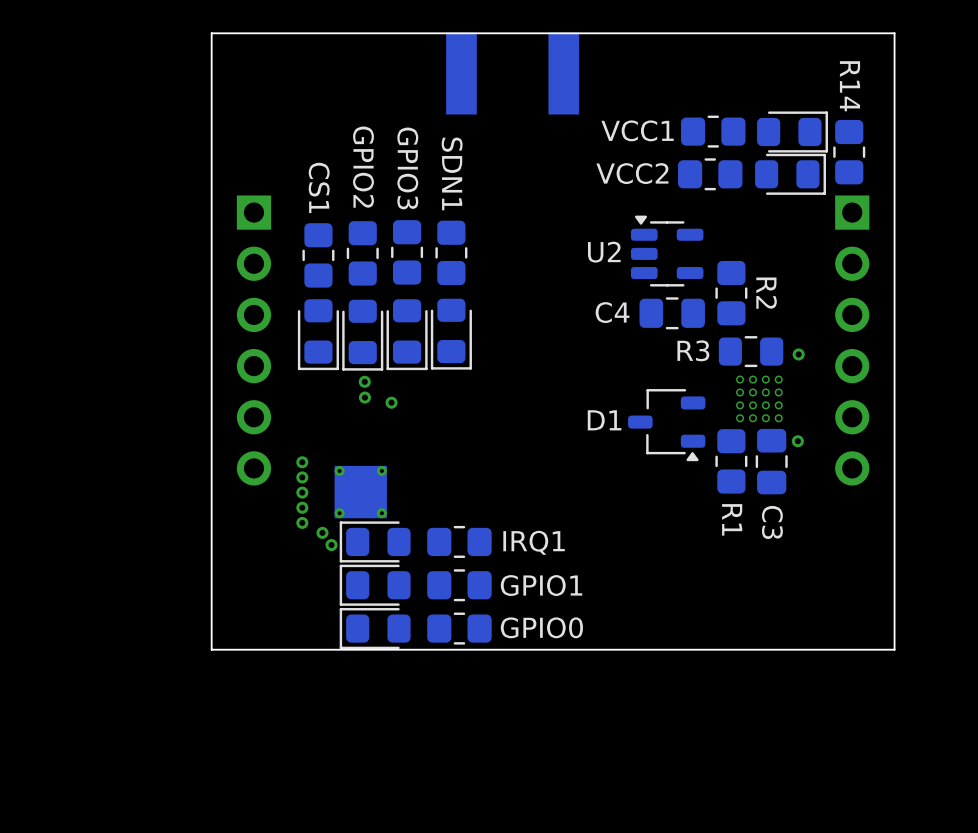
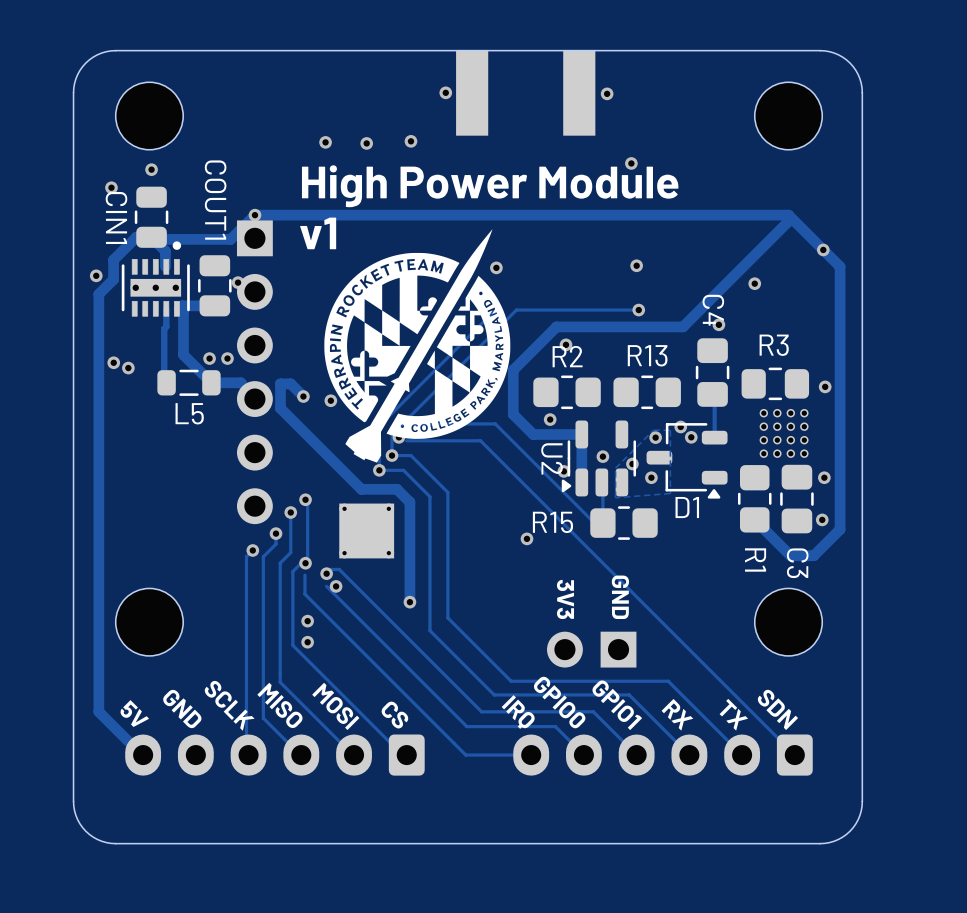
board edge: (793, 33) (894, 33) (894, 649) (211, 649) (211, 33) -> (820, 50) (834, 53) (849, 62) (858, 74) (862, 92) (862, 801) (858, 819) (849, 831) (838, 839) (820, 843) (110, 843) (97, 839) (82, 827) (75, 815) (73, 801) (73, 88) (77, 74) (85, 62) (93, 57) (106, 51) (210, 50)
via: none -> (445, 92)
via: none -> (607, 93)
part: none -> (149, 116)
part: none -> (788, 116)
via: none -> (410, 141)
via: none -> (325, 142)
via: none -> (366, 143)
part: (713, 131) -> none
VCC1: (792, 132) -> none
via: none -> (631, 163)
via: none -> (151, 169)
R14: (849, 152) -> none
text: none -> High Power Module (490, 186)
via: none -> (111, 187)
part: (710, 174) -> none
VCC2: (790, 174) -> none
via: none -> (254, 215)
track: none -> (788, 215) (254, 215) (230, 239) (153, 239)
track: none -> (788, 215) (840, 266) (840, 529) (813, 555) (790, 555) (754, 519)
track: none -> (788, 215) (788, 221) (683, 326) (556, 326) (513, 370) (513, 414) (533, 434) (581, 434) (581, 482)
CIN1: none -> (151, 217)
drawing: none -> [324, 229, 511, 463]
text: none -> v1 (318, 233)
via: none -> (823, 249)
via: none -> (636, 265)
track: none -> (165, 266) (165, 251) (151, 237) (136, 237) (113, 259) (113, 279) (98, 294) (98, 711) (142, 755)
via: none -> (496, 267)
via: none -> (96, 275)
part: none -> (155, 278)
U2 rotation: 0° (667, 251) -> 90° counterclockwise (598, 458)
U2 position: (667, 251) -> (598, 458)
part: (407, 252) -> none
part: (451, 252) -> none
part: (362, 253) -> none
via: none -> (238, 282)
part: (318, 255) -> none
via: none -> (754, 283)
COUT1: none -> (214, 285)
track: none -> (214, 305) (182, 305) (179, 308) (183, 313) (183, 354) (211, 382) (241, 383)
track: none -> (166, 308) (166, 326) (164, 328) (164, 380) (166, 382)
track: none -> (638, 310) (516, 310) (392, 434) (392, 455) (410, 455) (447, 492) (447, 617) (511, 681) (668, 681) (742, 755)
via: none -> (638, 310)
track: none -> (497, 312) (493, 312) (379, 426) (379, 470) (403, 470) (429, 496) (429, 630) (494, 694) (629, 694) (689, 755)
R2 rotation: 0° (731, 293) -> 90° clockwise (567, 392)
R2 position: (731, 293) -> (567, 392)
R2 name position: R2 (766, 293) -> R2 (567, 356)
via: none -> (718, 324)
C4 rotation: 0° (672, 313) -> 90° clockwise (712, 372)
via: none -> (565, 344)
via: none -> (209, 358)
via: none -> (227, 358)
via: none -> (113, 362)
CS1: (318, 334) -> none
GPIO3: (407, 334) -> none
SDN1: (451, 334) -> none
GPIO2: (362, 335) -> none
via: none -> (128, 368)
part: (852, 340) -> none
L5: none -> (189, 382)
R3 name position: R3 (693, 350) -> R3 (774, 345)
R13: none -> (647, 392)
track: none -> (712, 394) (714, 396) (714, 437)
track: none -> (303, 396) (290, 383) (280, 383) (280, 408) (361, 489) (397, 489) (409, 502) (409, 602)
via: none -> (303, 396)
via: none -> (330, 400)
via: (364, 381) -> none
via: none -> (550, 419)
track: none -> (402, 423) (495, 423) (594, 523) (602, 523) (601, 482)
via: none -> (680, 426)
zone outline: none -> (670, 430) (653, 430) (615, 468) (615, 497) (670, 493) (670, 430)
via: (364, 397) -> none
via: none -> (655, 437)
via: none -> (691, 437)
track: none -> (406, 440) (480, 440) (794, 755)
via: none -> (392, 455)
D1 name position: D1 (604, 420) -> D1 (687, 507)
via: none -> (602, 456)
via: none -> (632, 464)
via: none -> (379, 470)
via: none -> (563, 471)
via: none -> (651, 477)
track: none -> (307, 504) (307, 556) (292, 571) (292, 645) (402, 755) (405, 755)
track: none -> (290, 512) (290, 552) (280, 563) (280, 682) (352, 755)
via: none -> (290, 512)
via: (302, 477) -> none
via: none -> (822, 519)
R15: none -> (623, 523)
via: (302, 492) -> none
track: none -> (276, 533) (276, 544) (263, 556) (263, 718) (300, 755)
via: none -> (276, 533)
via: none -> (526, 538)
via: (302, 507) -> none
track: none -> (252, 550) (246, 556) (247, 755)
via: none -> (252, 550)
track: none -> (326, 569) (339, 569) (481, 711) (593, 711) (636, 755)
track: none -> (304, 575) (304, 594) (465, 755) (531, 755)
IRQ1: (375, 541) -> none
part: (459, 541) -> none
track: none -> (326, 586) (466, 726) (555, 726) (583, 755)
text: none -> GND (620, 597)
text: none -> 3V3 (565, 599)
via: none -> (409, 602)
via: none -> (307, 621)
part: none -> (149, 622)
part: none -> (788, 622)
GPIO1: (375, 585) -> none
part: (459, 585) -> none
via: none -> (307, 642)
part: none -> (591, 649)
GPIO0: (375, 628) -> none
part: (459, 628) -> none
text: none -> GPIO0 (559, 702)
text: none -> GPIO1 (617, 705)
text: none -> MISO (280, 705)
text: none -> MOSI (335, 706)
text: none -> SCLK (229, 705)
text: none -> GND (182, 708)
text: none -> SDN (777, 709)
text: none -> IRQ (518, 712)
text: none -> 5V (134, 713)
text: none -> CS (394, 715)
text: none -> RX (677, 714)
text: none -> TX (733, 714)
part: none -> (274, 755)
part: none -> (663, 755)

